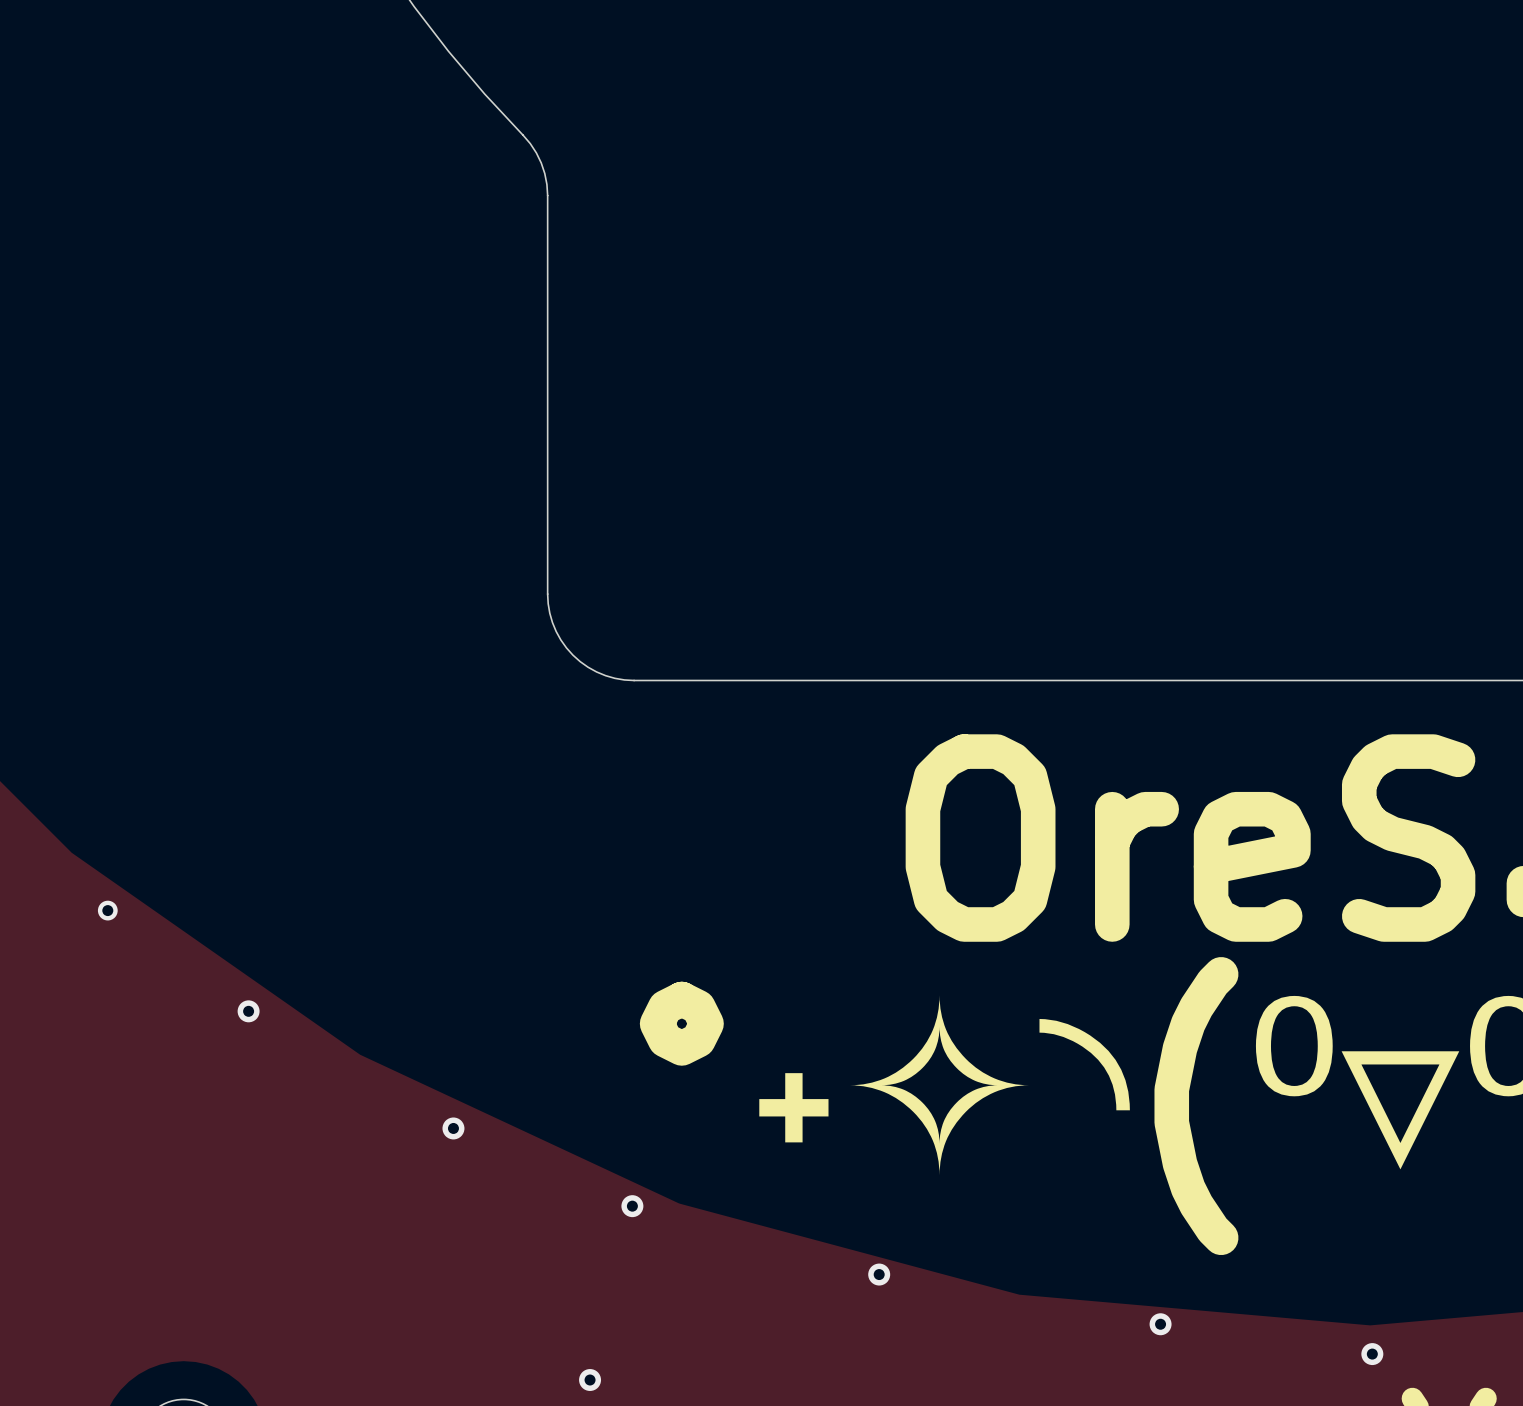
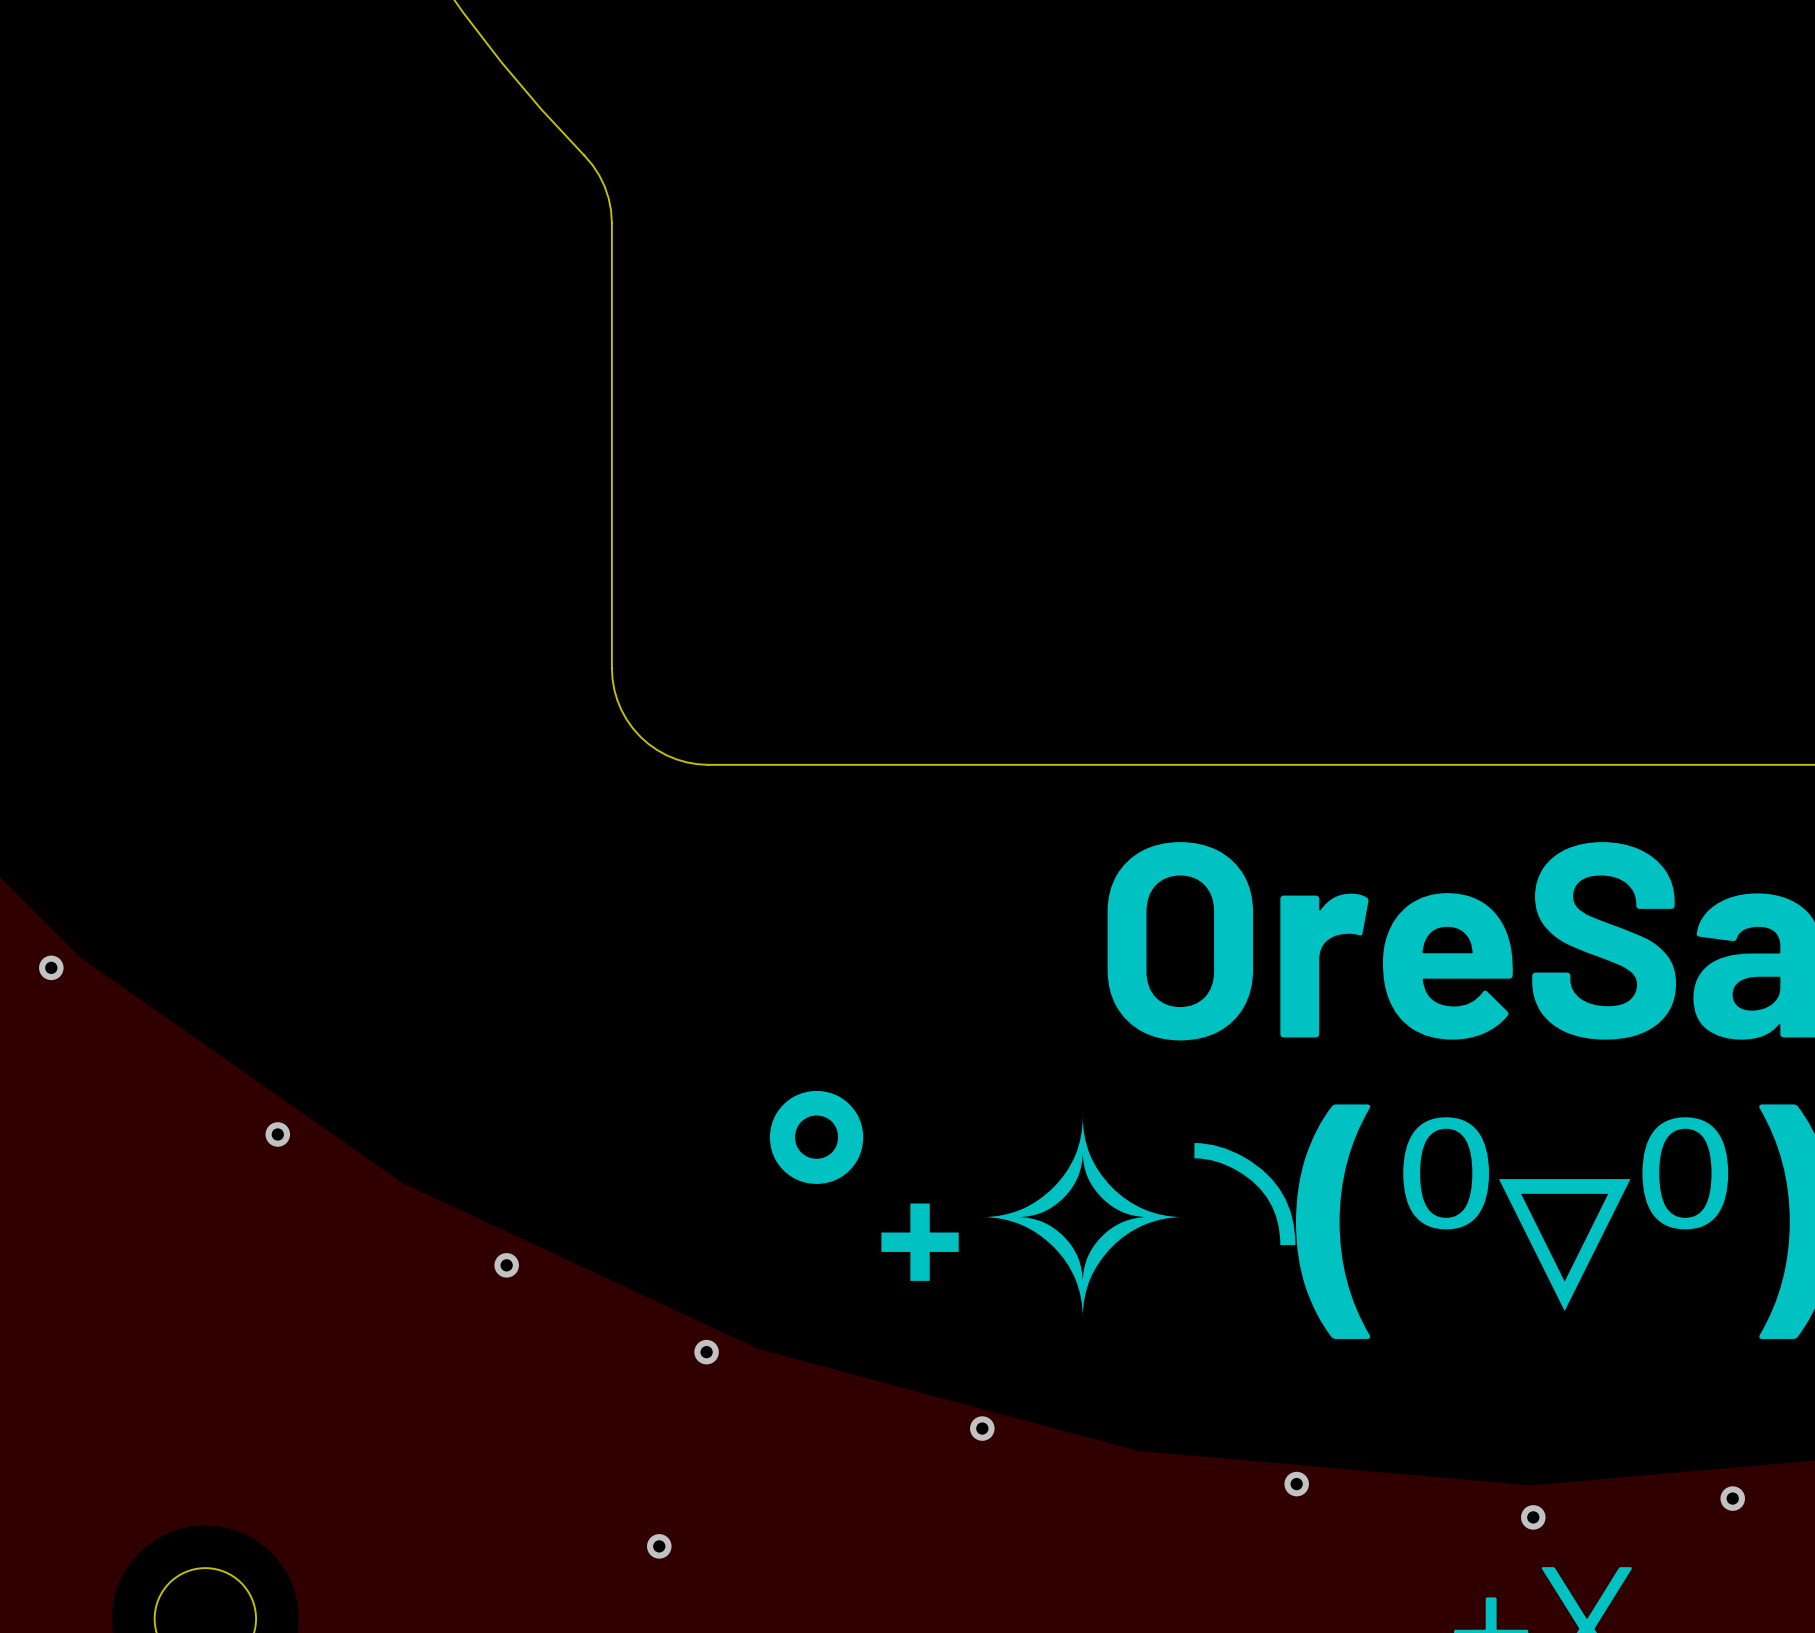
via: none -> (51, 967)
via: (107, 910) -> none

